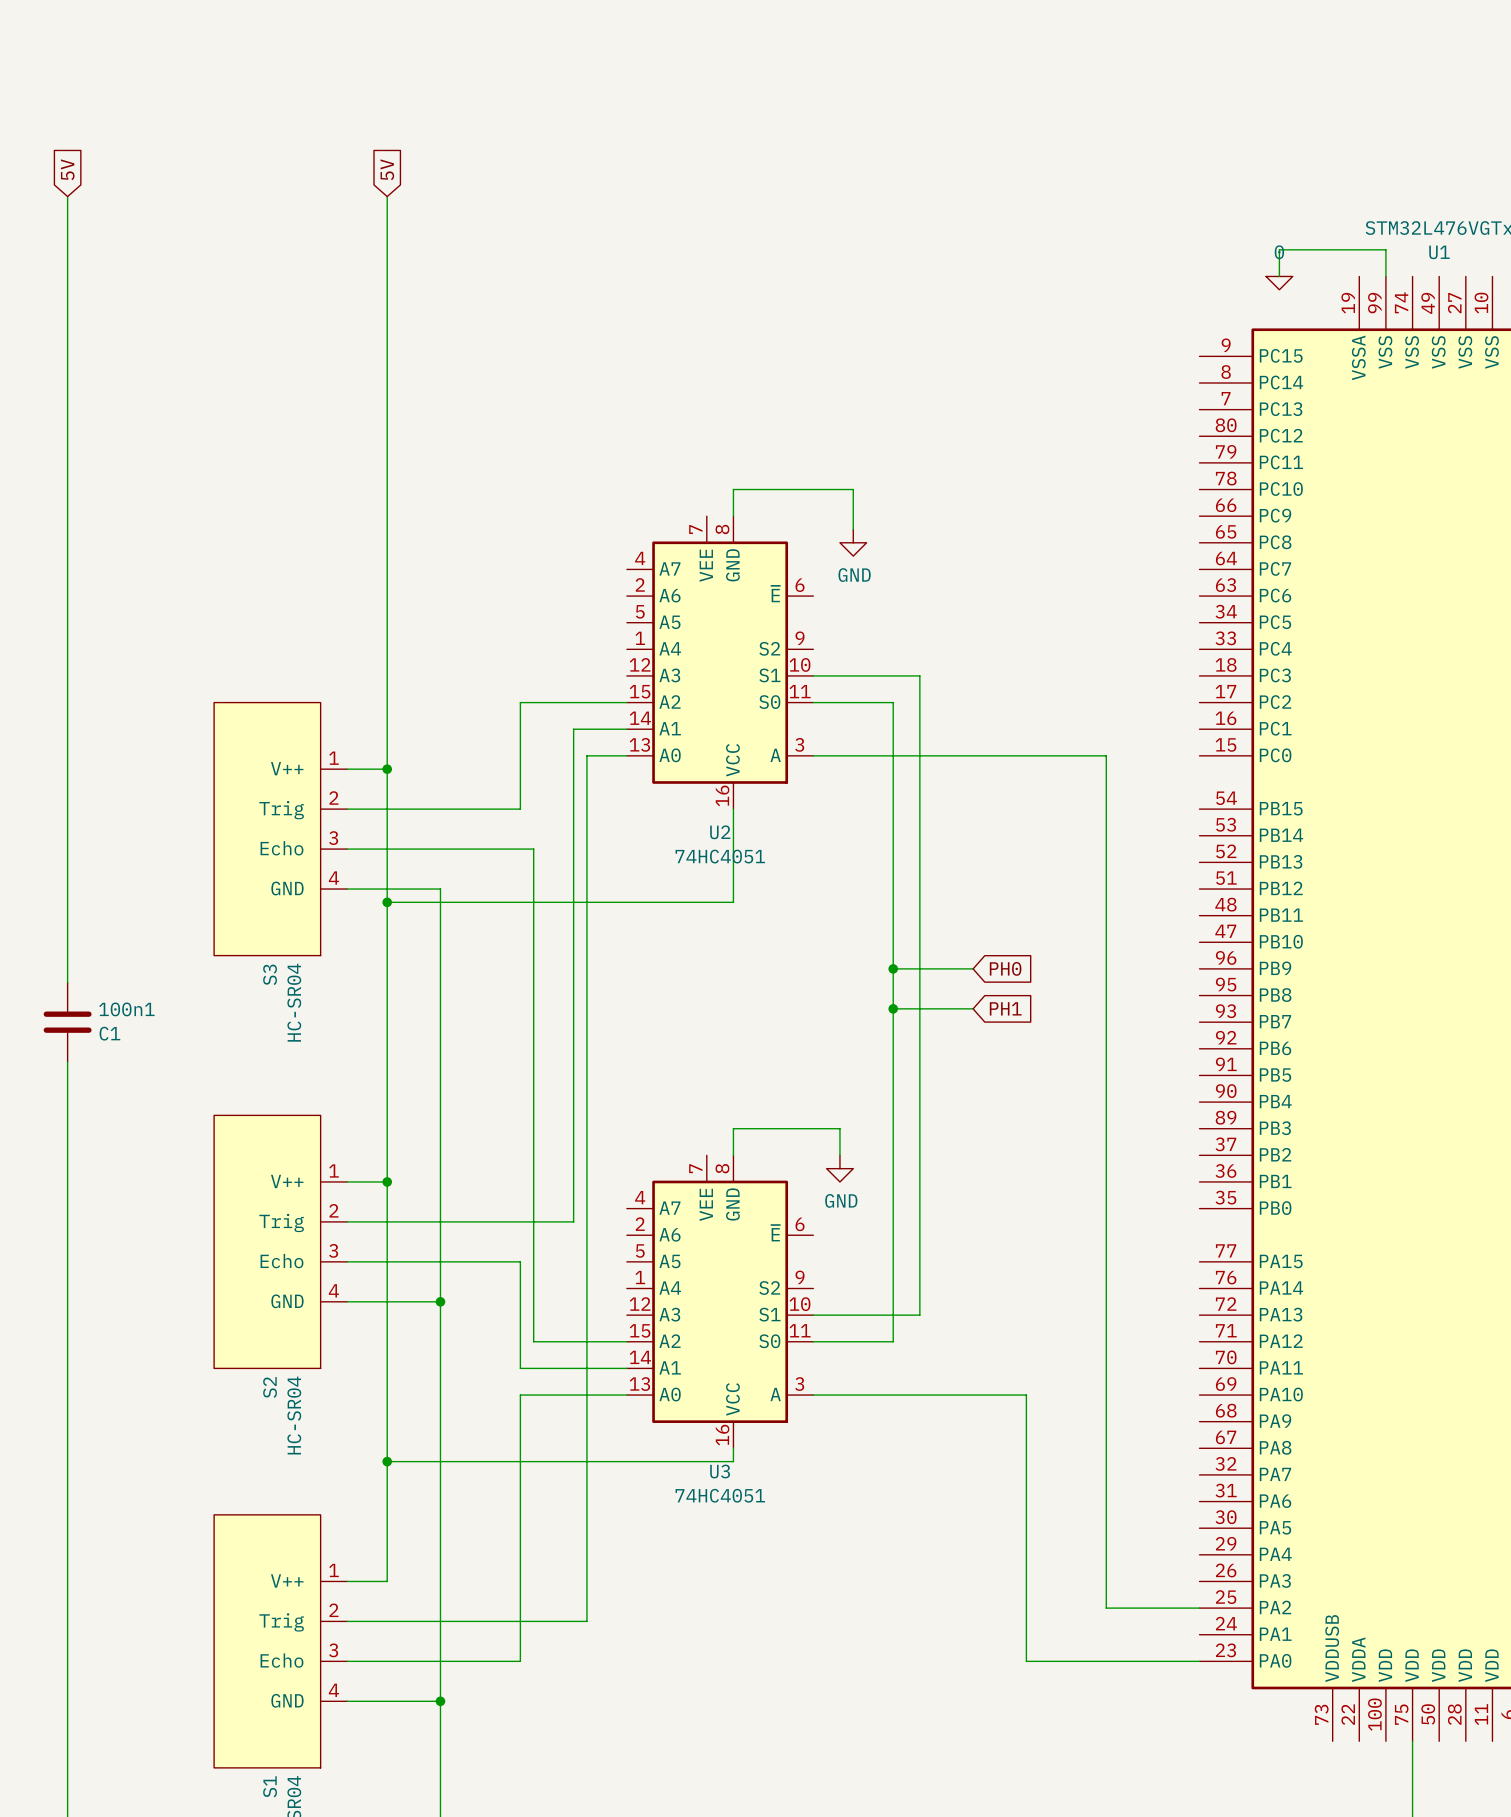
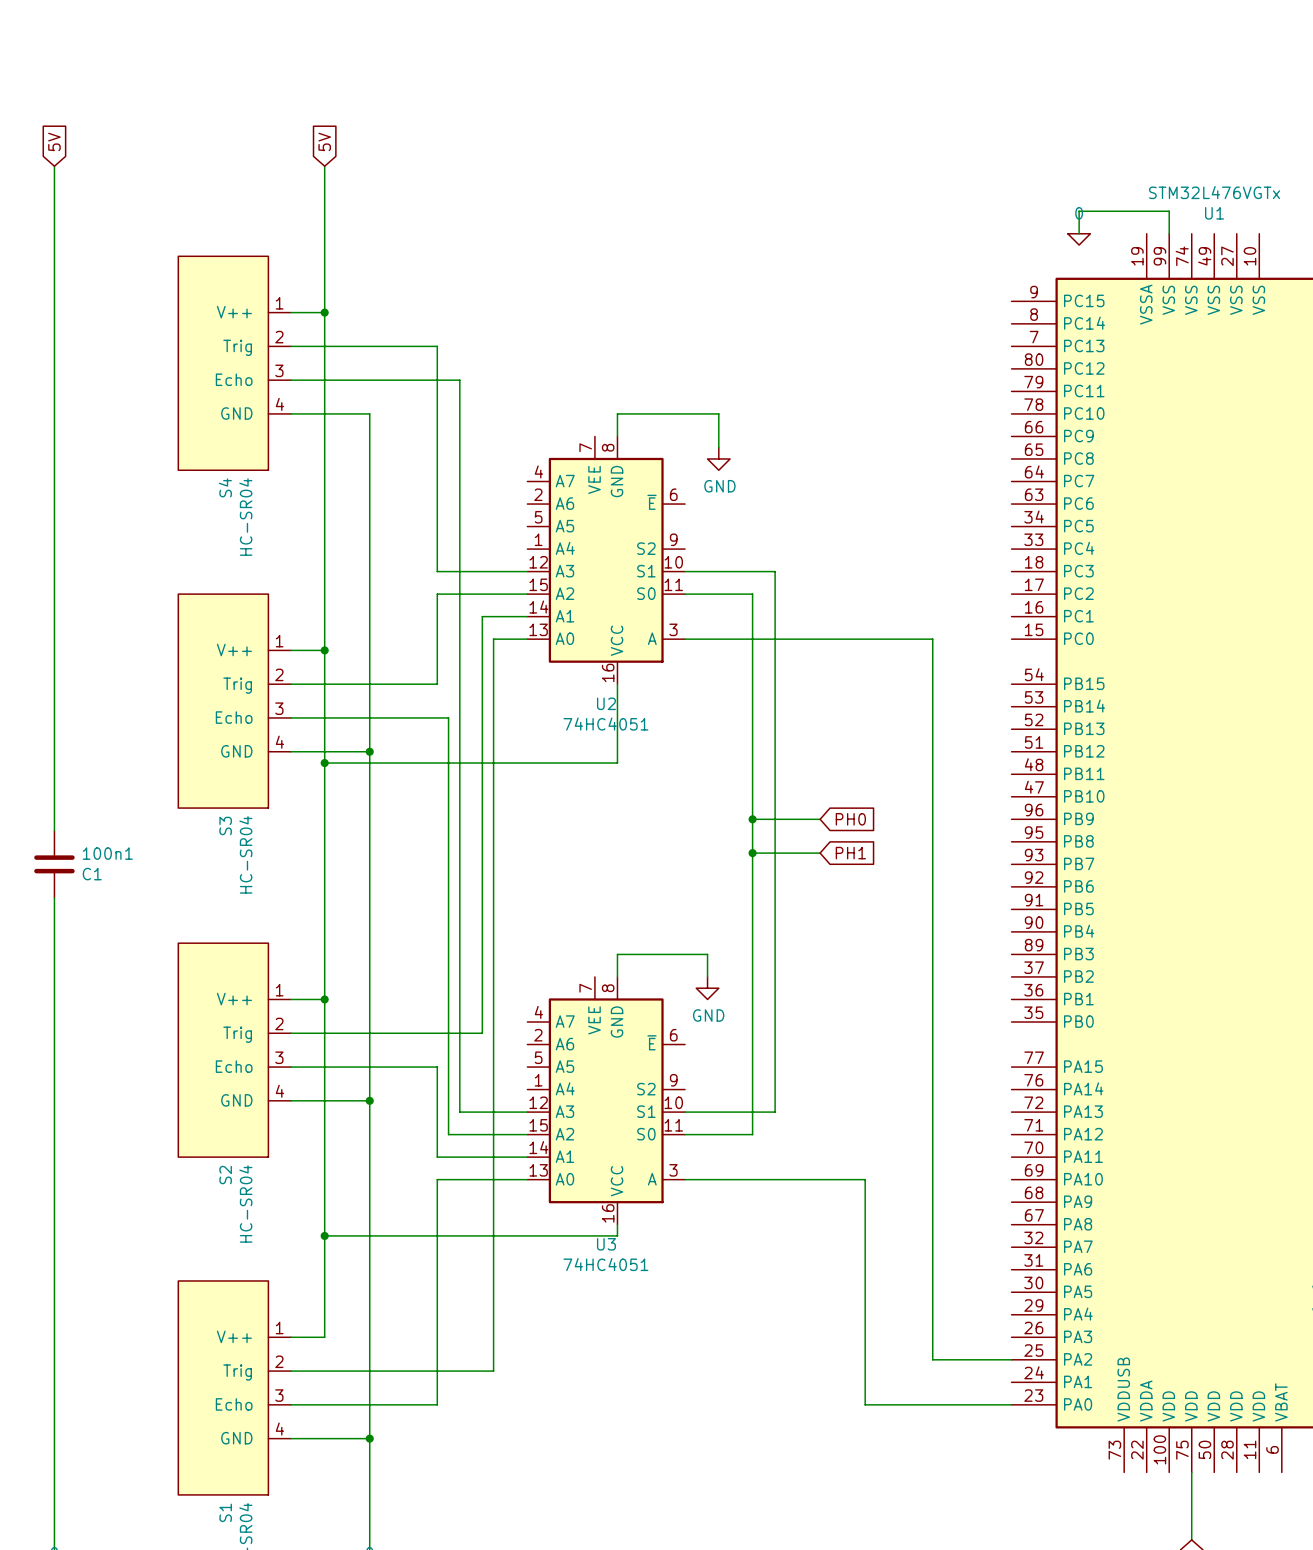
wire: none -> (290, 312) (324, 312)
junction: none -> (324, 312)
wire: none -> (290, 346) (437, 346) (437, 571) (527, 571)
S4: none -> HC-SR04 (234, 363)
wire: none -> (290, 380) (459, 380) (459, 1112) (527, 1112)
wire: none -> (290, 413) (369, 413) (369, 751)
junction: none -> (369, 751)

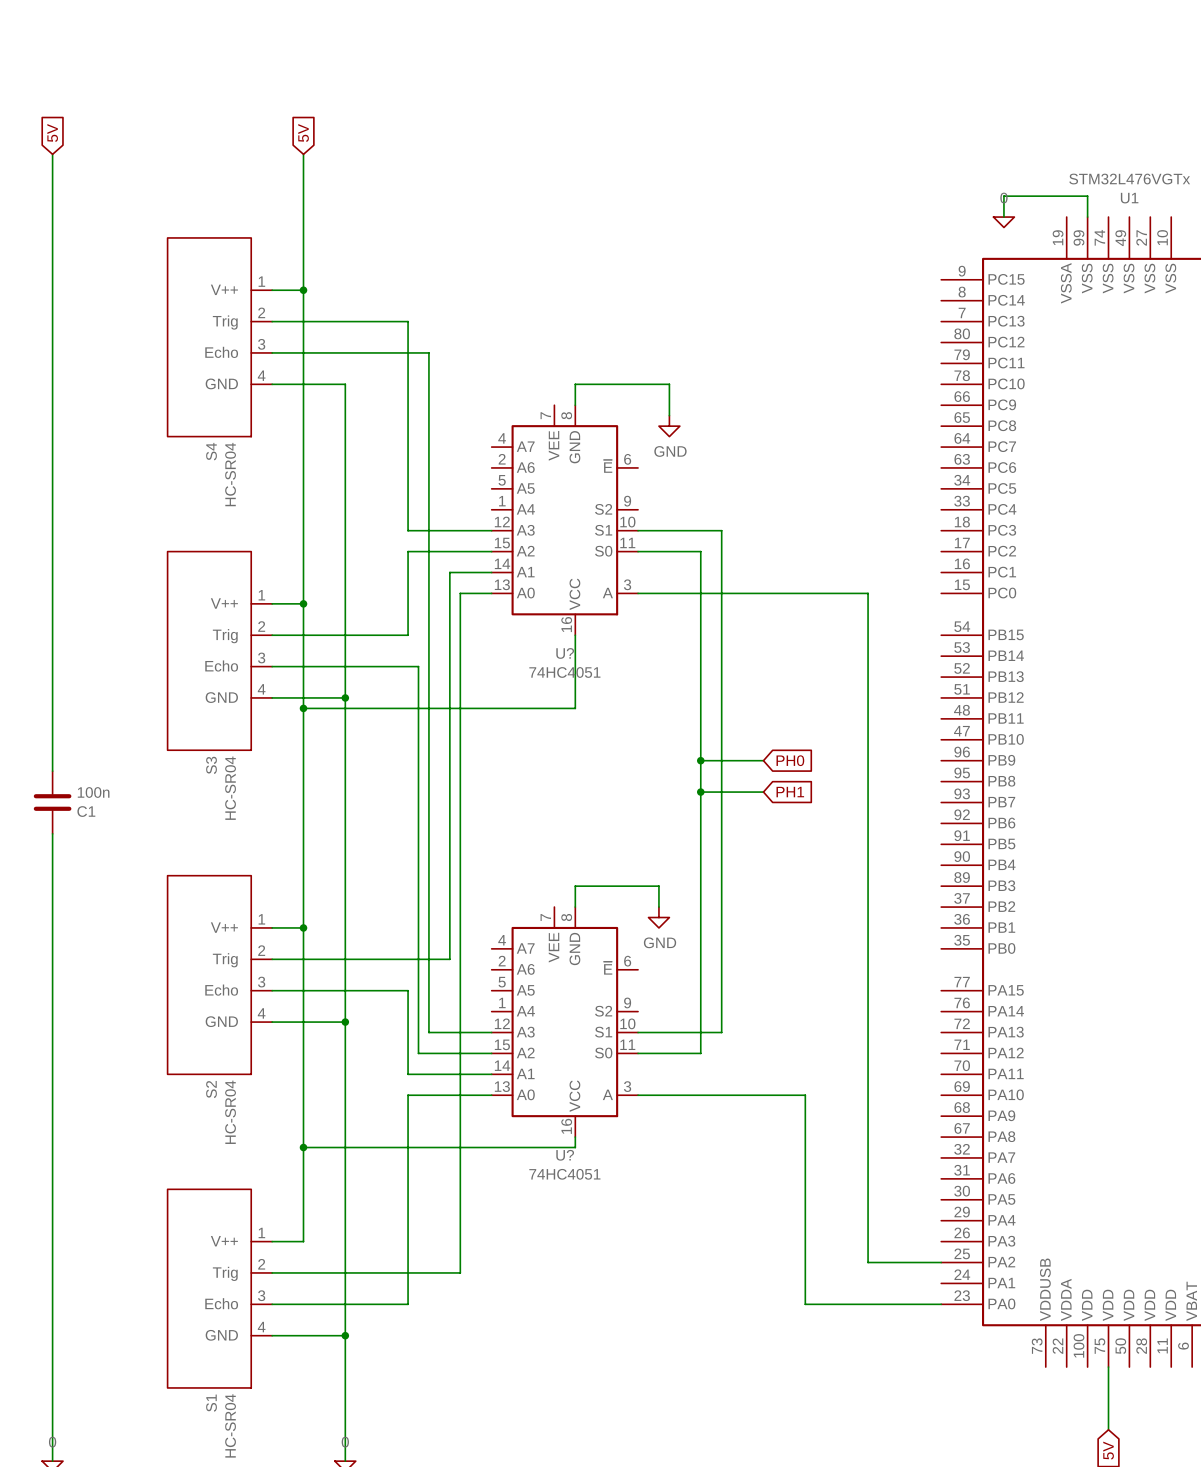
U2 name: U2 (606, 703) -> U? (565, 653)
100n1 name: 100n1 (107, 853) -> 100n (93, 792)
U3 name: U3 (606, 1244) -> U? (565, 1155)

